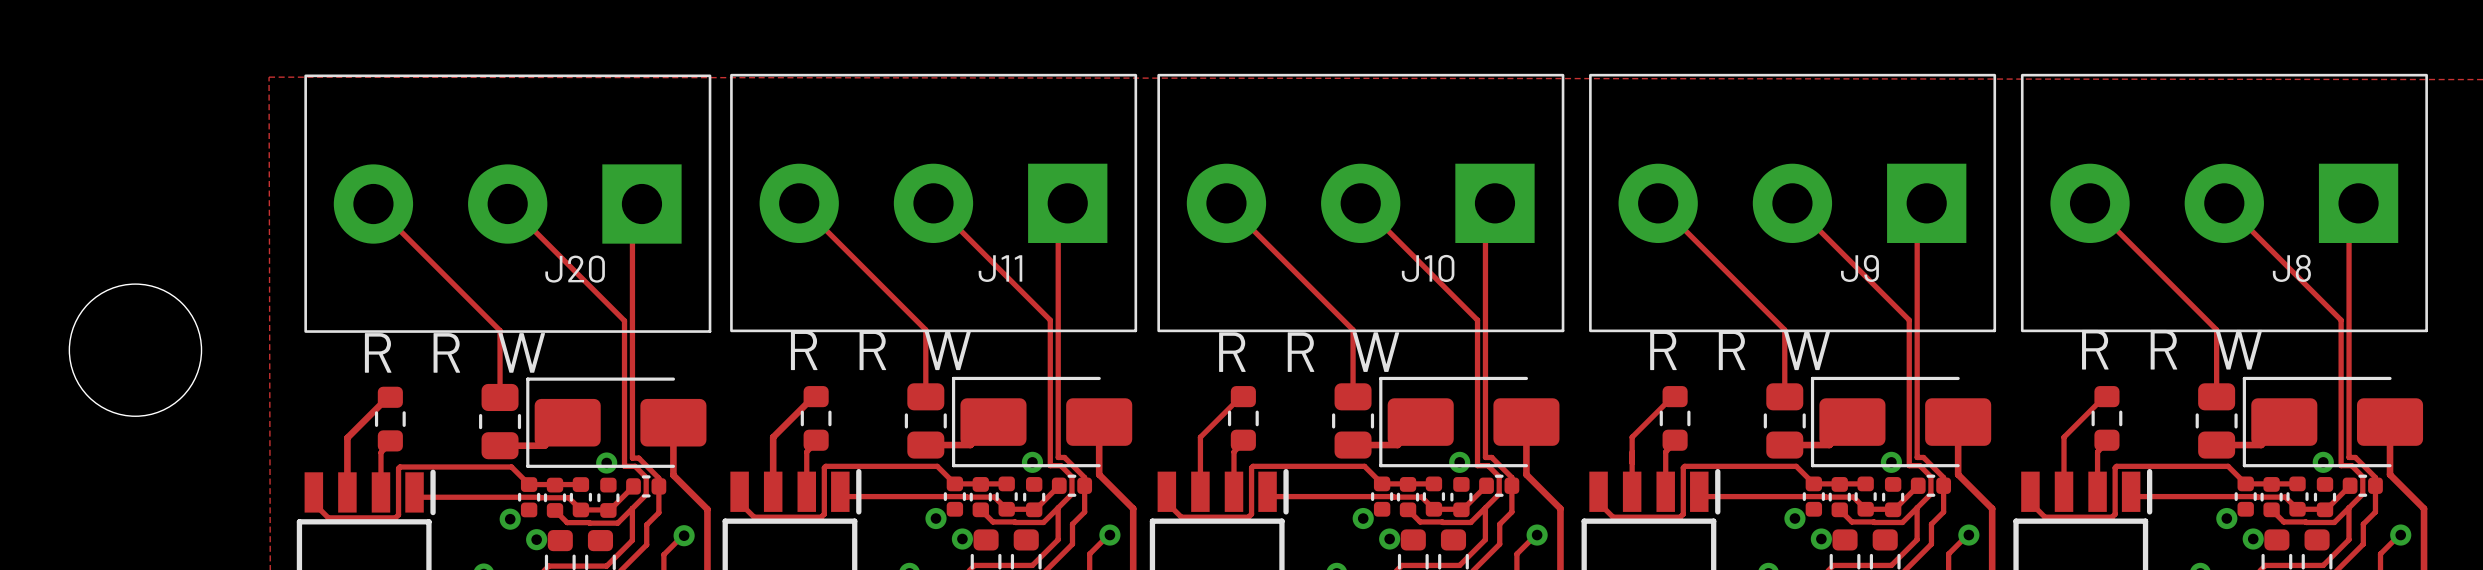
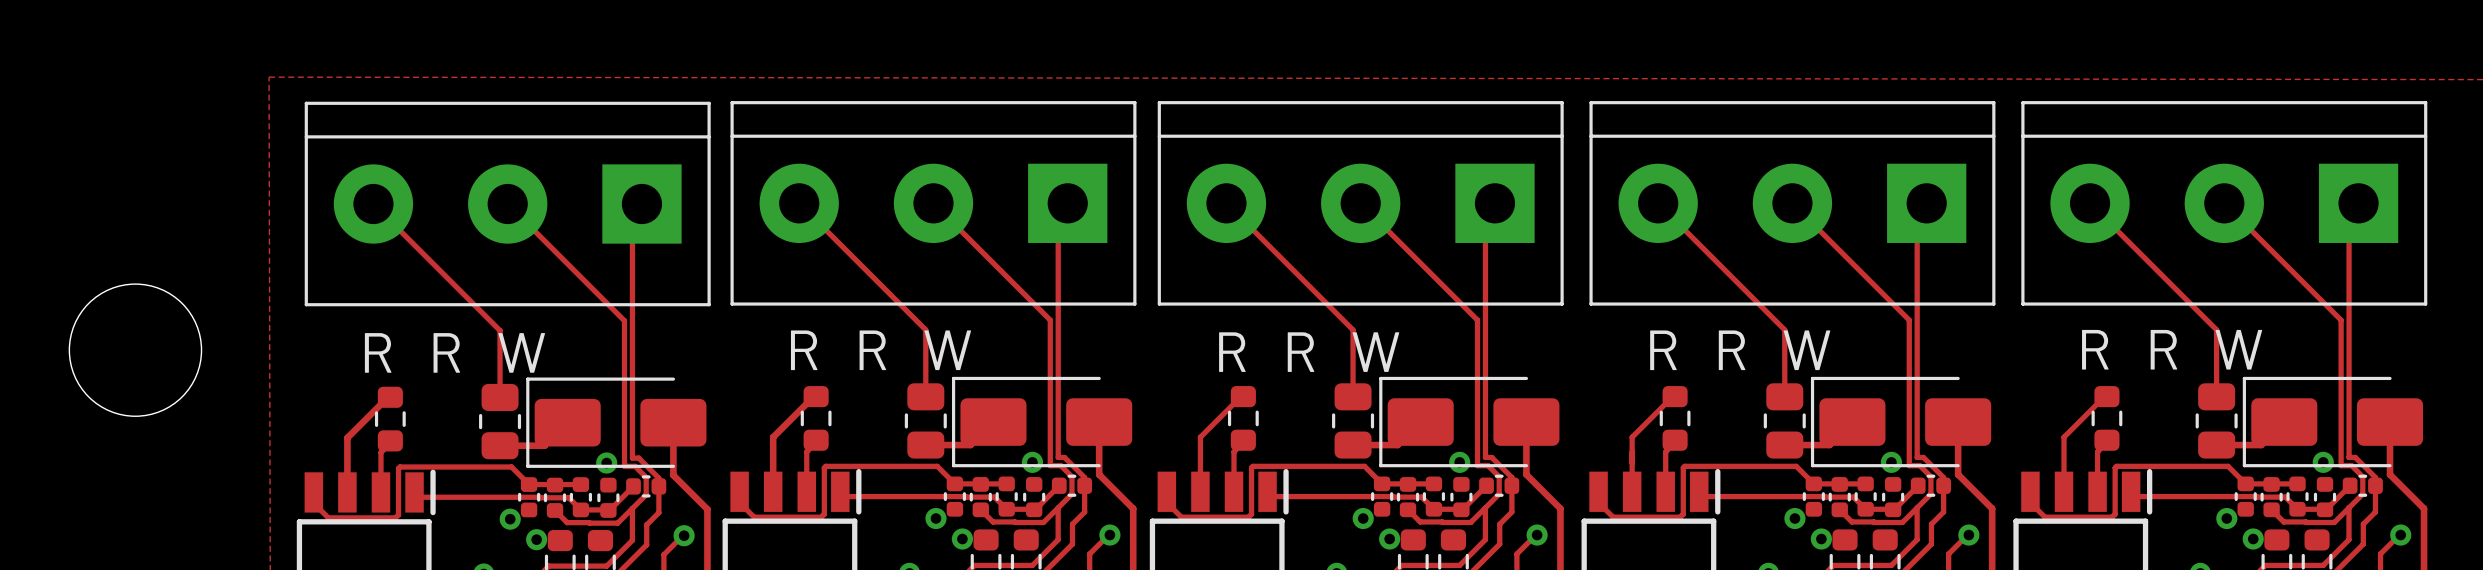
J20: (507, 203) -> none
J11: (933, 203) -> none
part: none -> (933, 203)
J10: (1360, 203) -> none
part: none -> (1360, 203)
J9: (1792, 203) -> none
part: none -> (1792, 203)
J8: (2224, 203) -> none
part: none -> (2224, 203)
part: none -> (507, 204)

